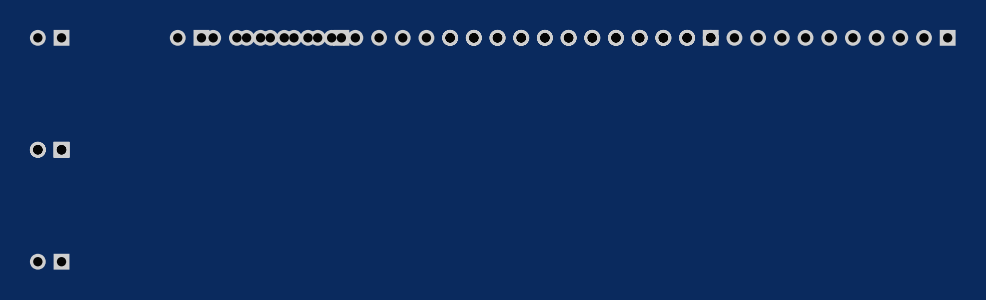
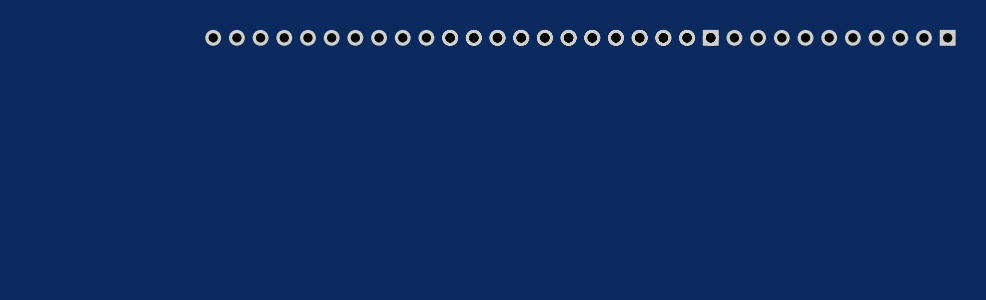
part: (49, 37) -> none
part: (189, 37) -> none
part: (293, 37) -> none
part: (49, 149) -> none
part: (49, 261) -> none

